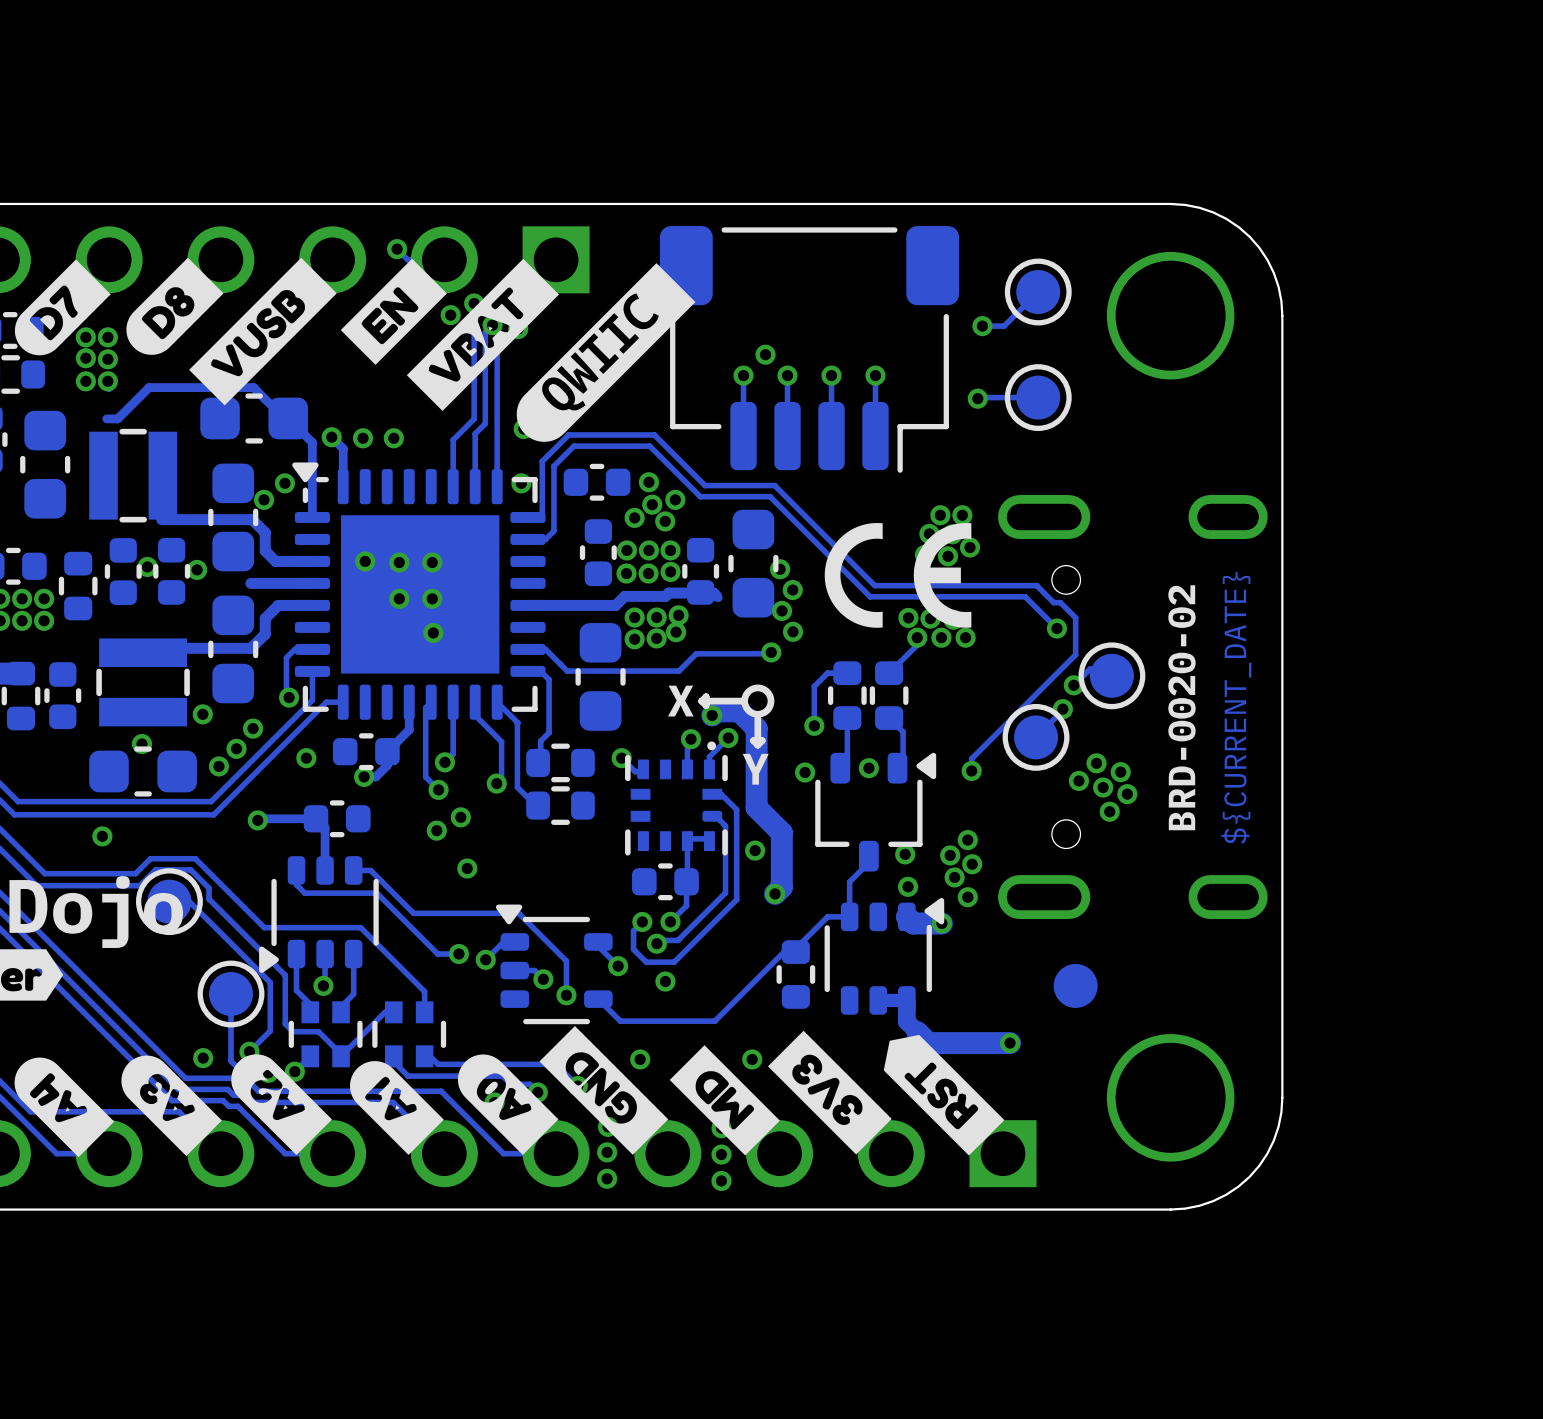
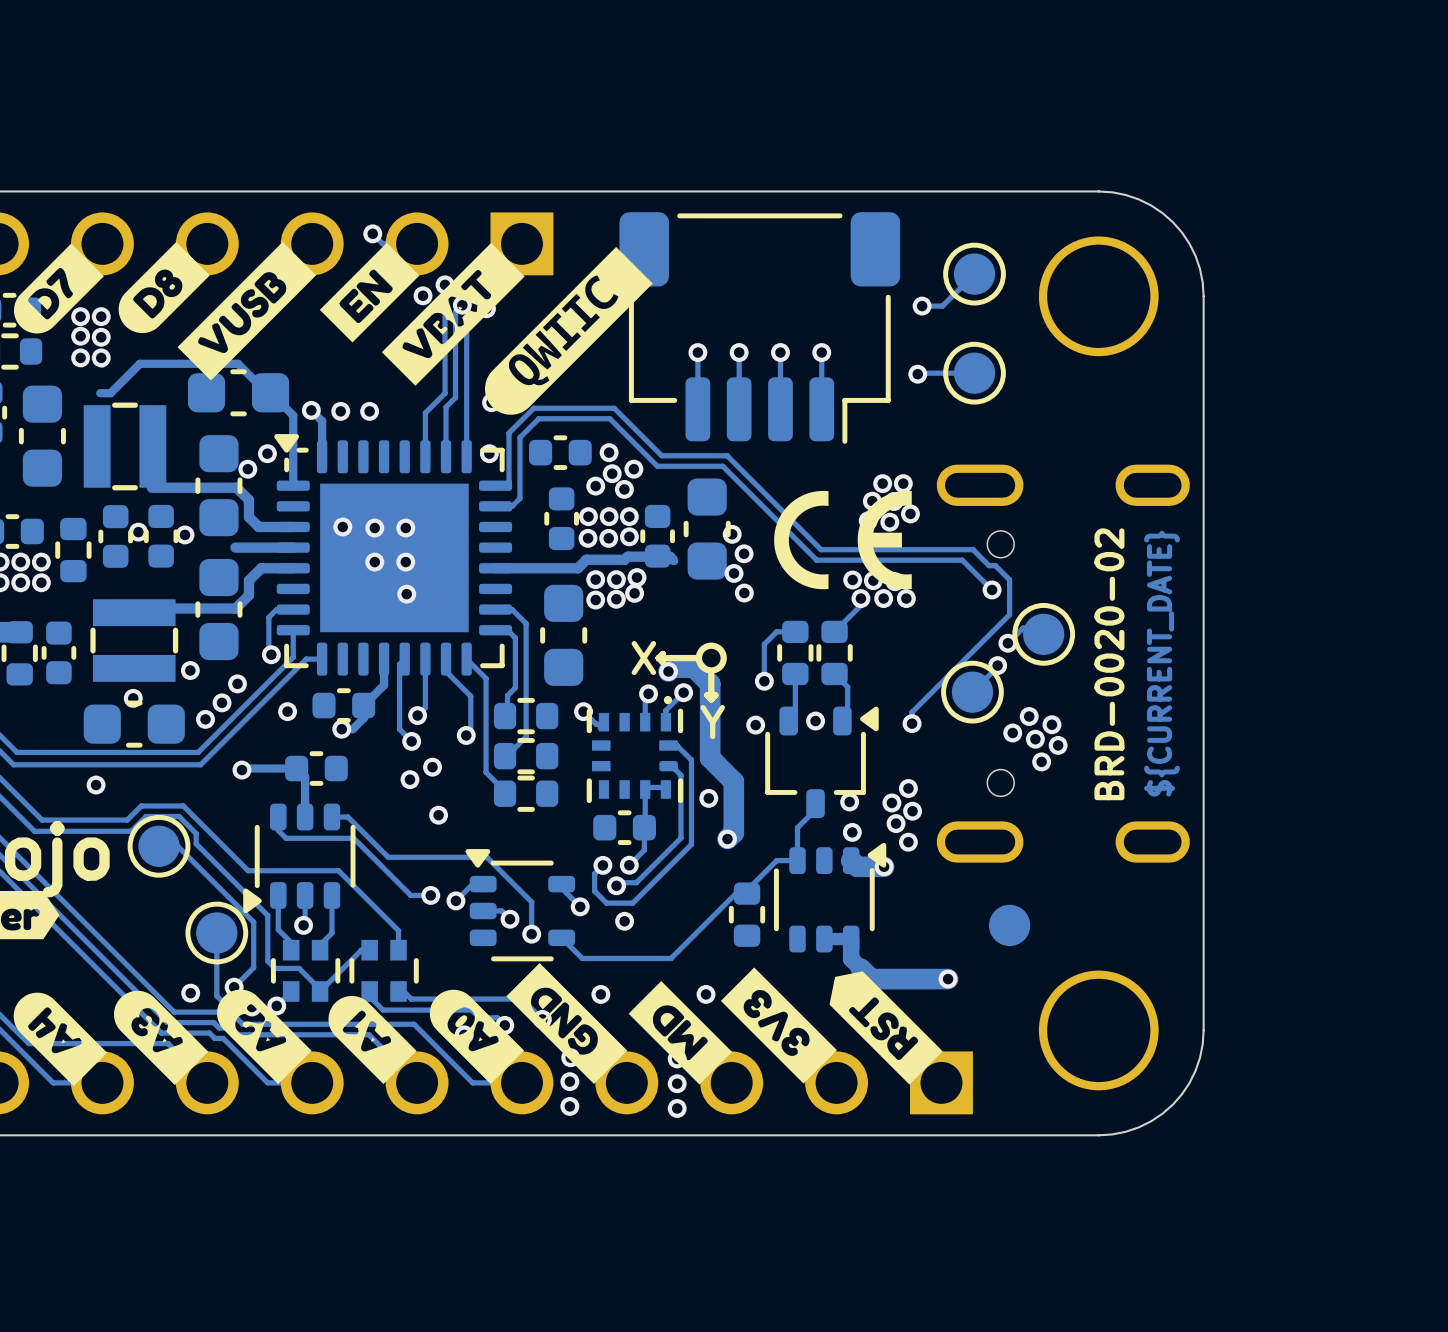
via: (765, 354) -> none
track: (771, 652) (696, 653) (679, 671) (567, 671) (560, 664) -> (507, 755) (526, 736) (526, 623)
via: (771, 652) -> none
track: (517, 723) (517, 787) (540, 810) -> (486, 678) (486, 772) (507, 794)
part: none -> (526, 793)

